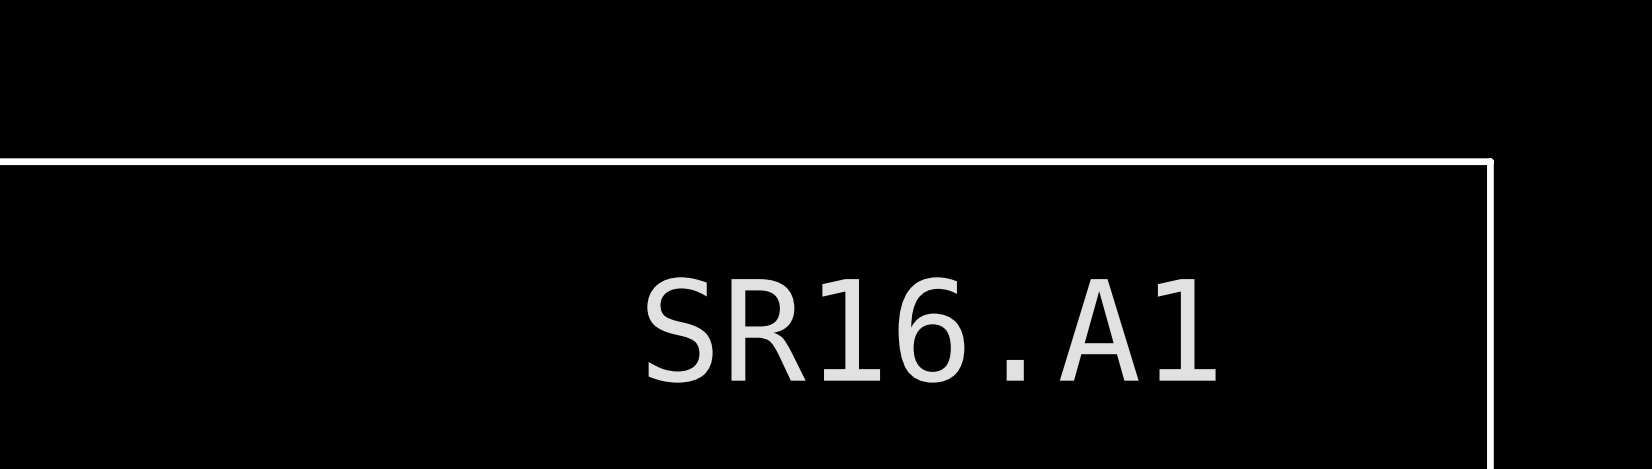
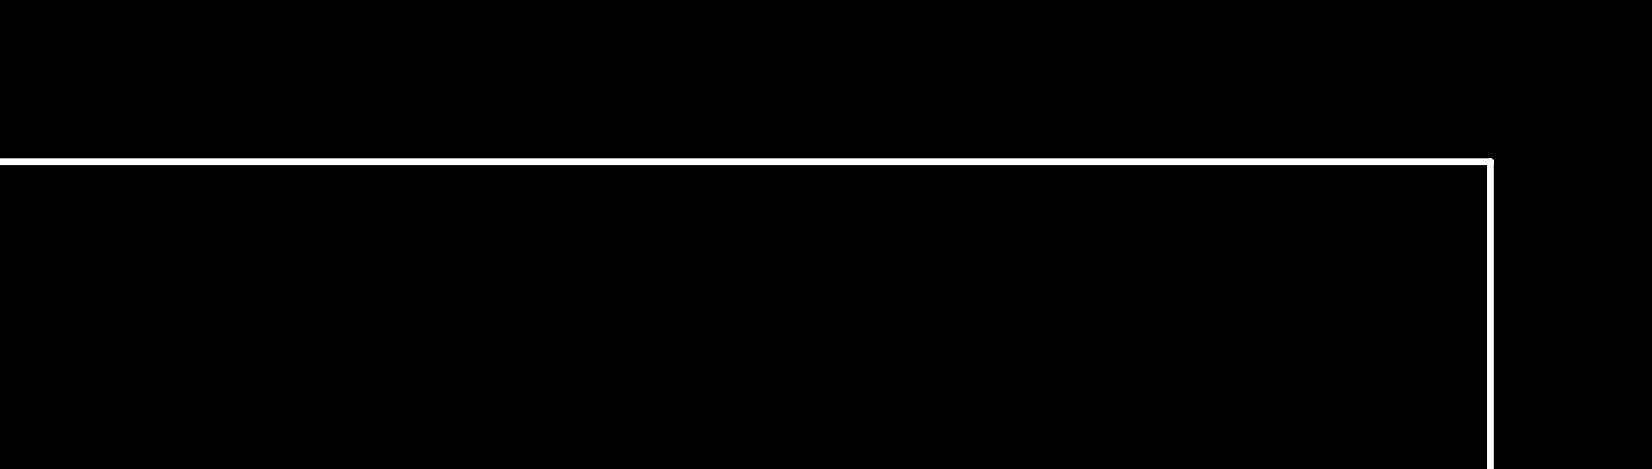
text: SR16.A1 (931, 329) -> none

